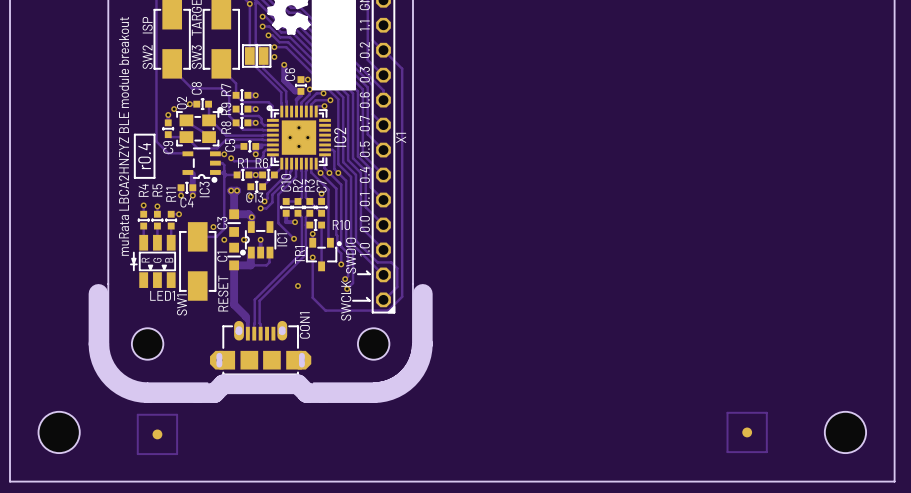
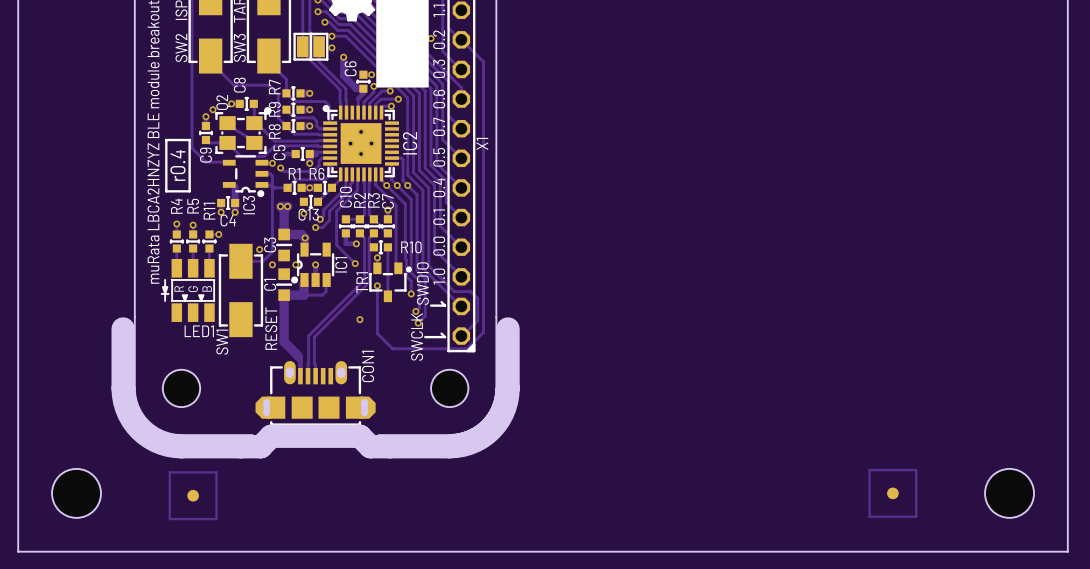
via: none -> (431, 38)

